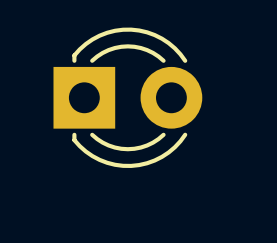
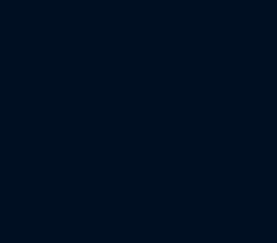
part: (127, 97) -> none

